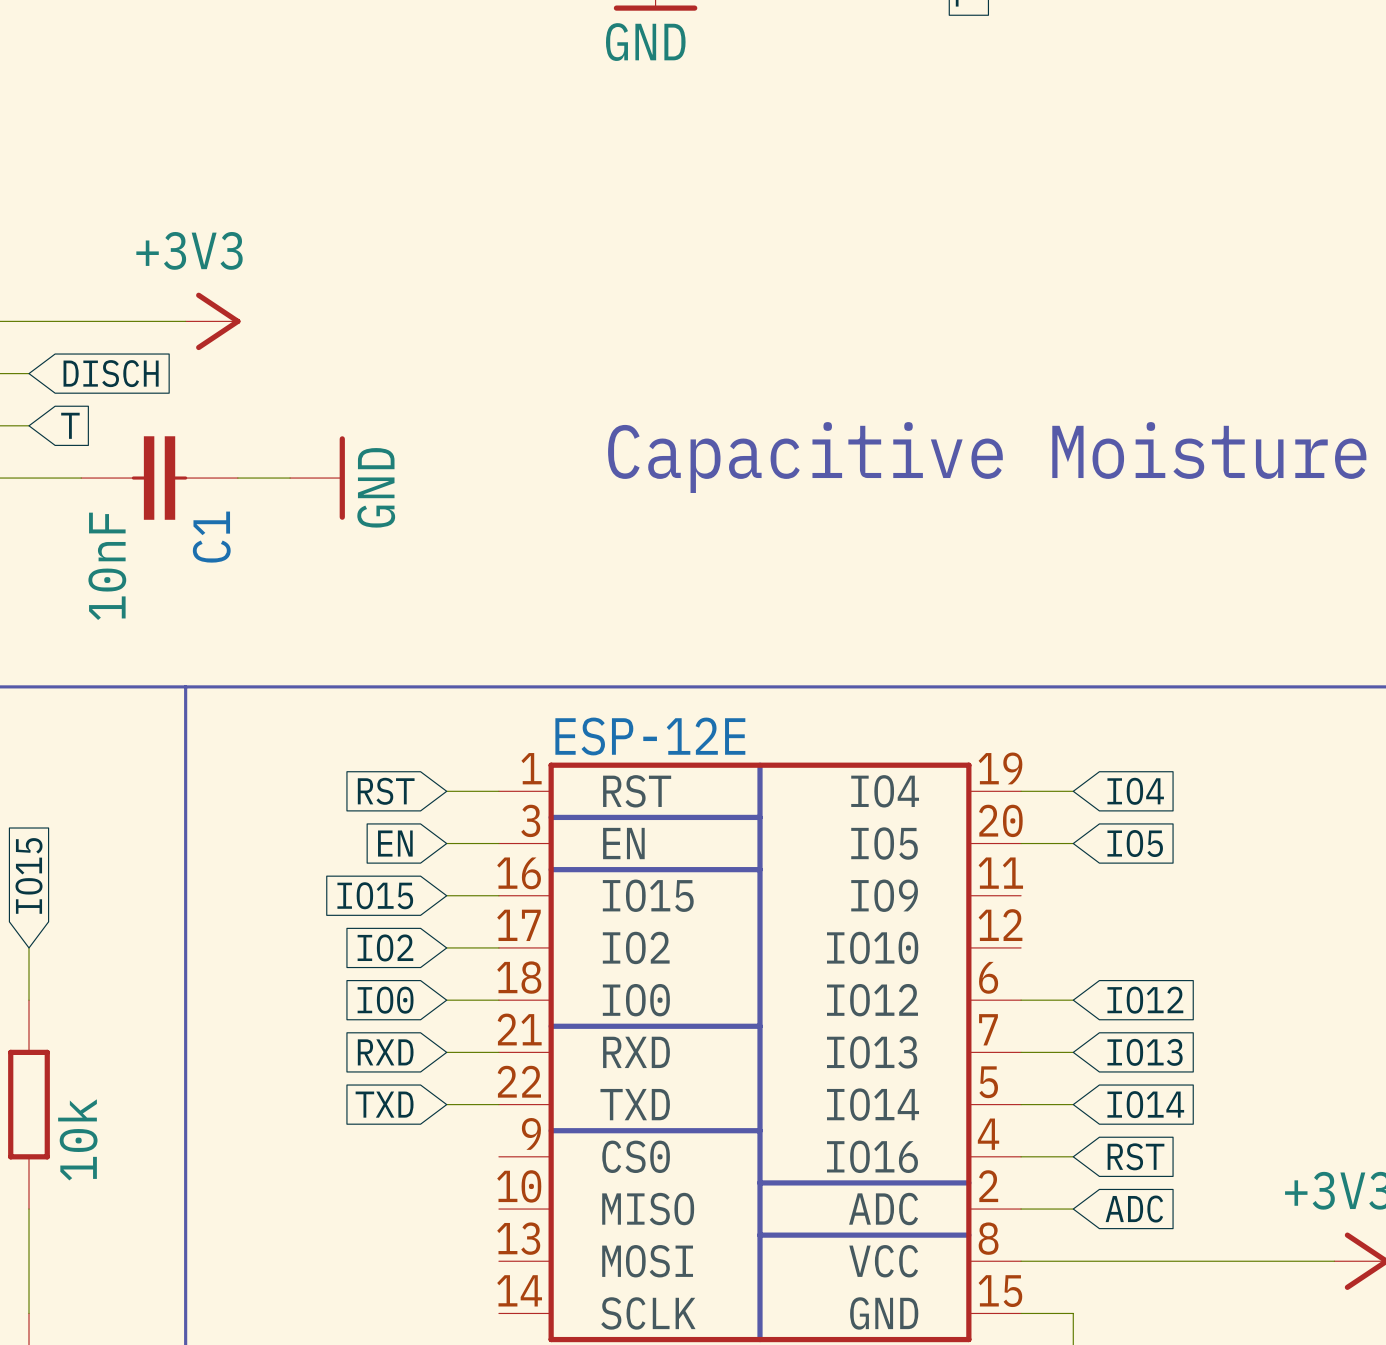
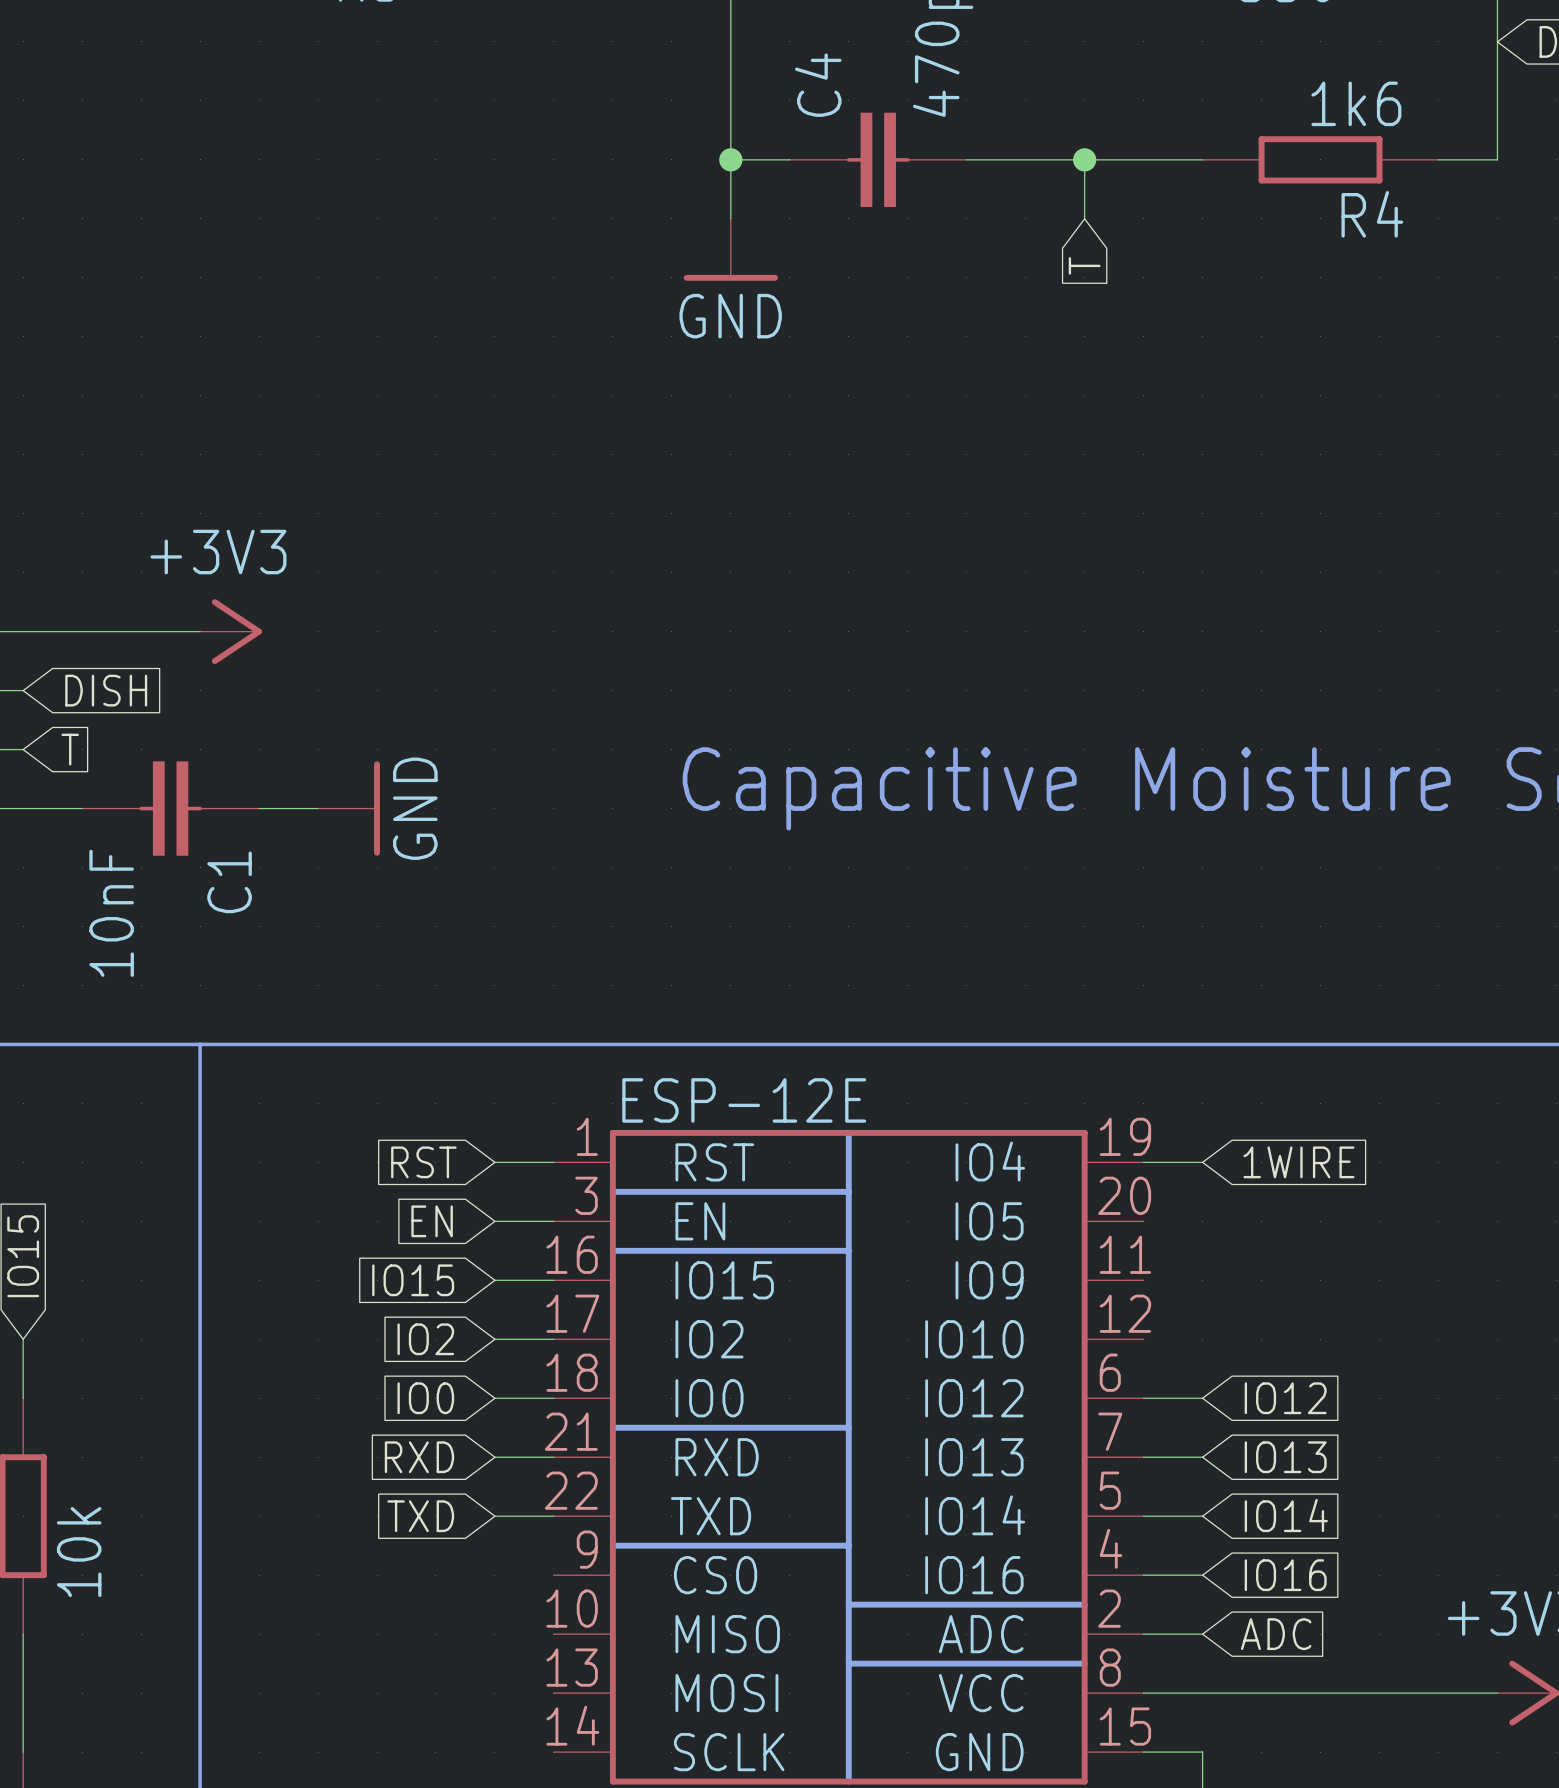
global label: DISCH (111, 373) -> DISH (106, 690)
global label: IO4 (1135, 791) -> 1WIRE (1298, 1162)
wire: (1021, 843) (1073, 843) -> none
global label: IO5 (1135, 843) -> none
global label: RST (1136, 1156) -> IO16 (1285, 1575)

